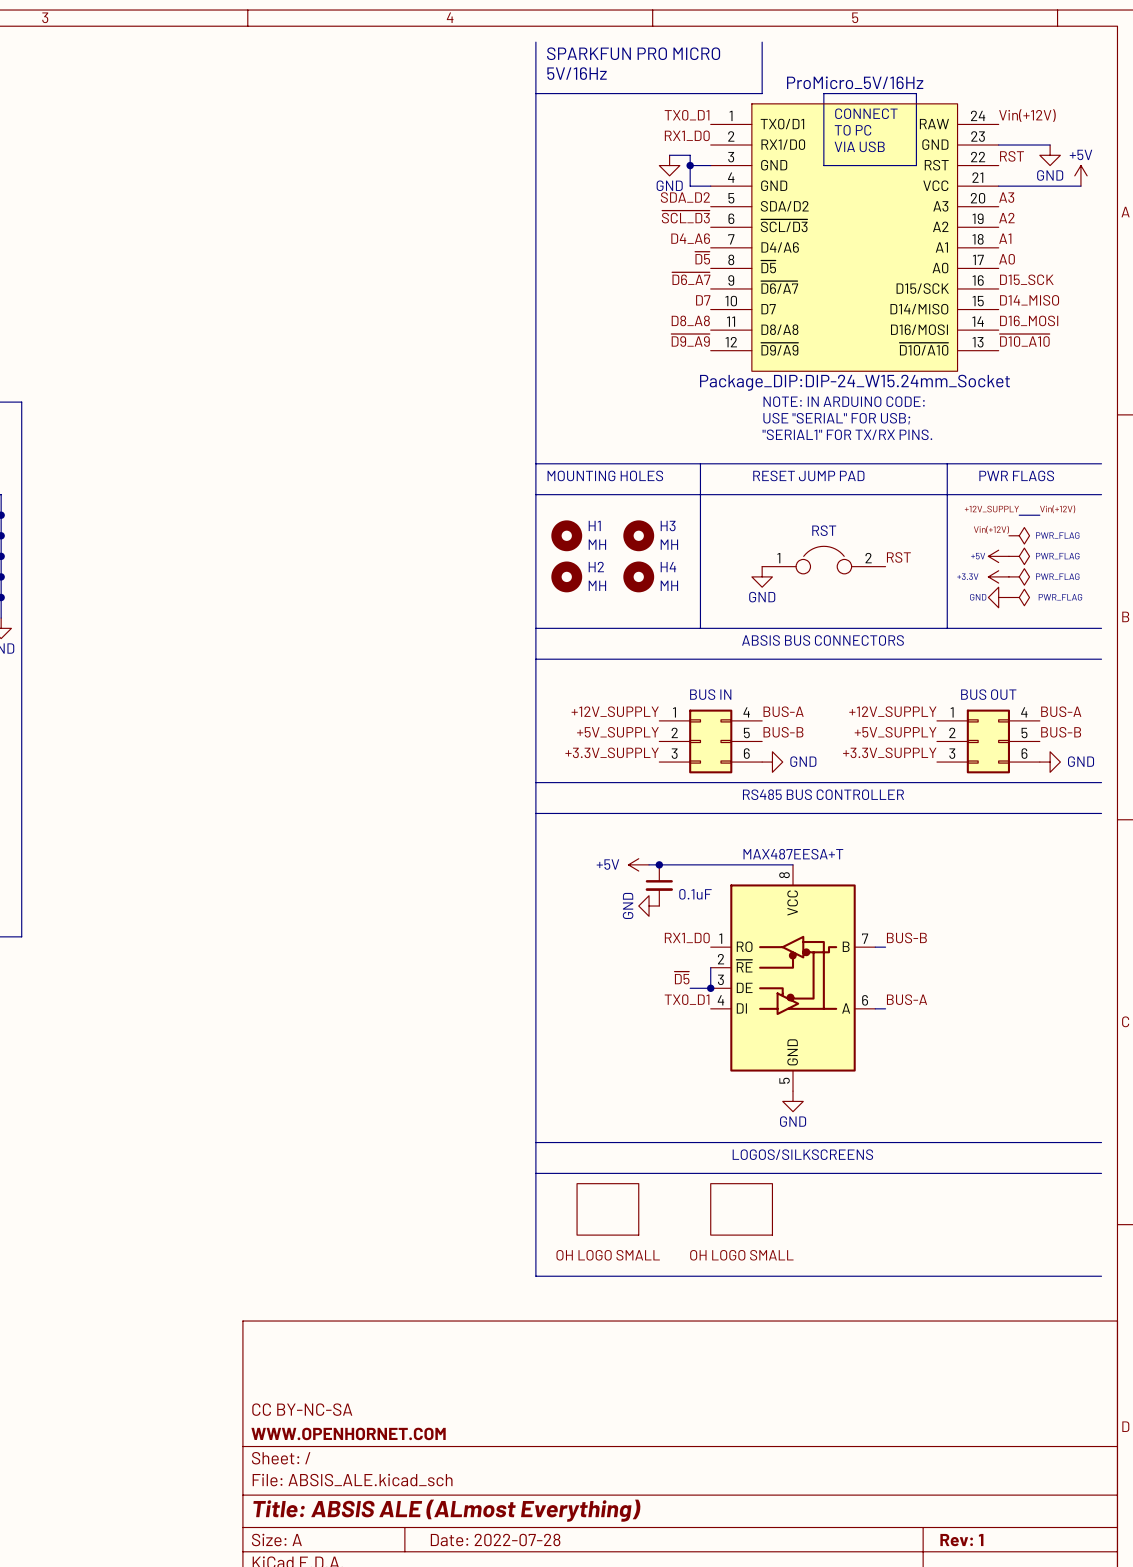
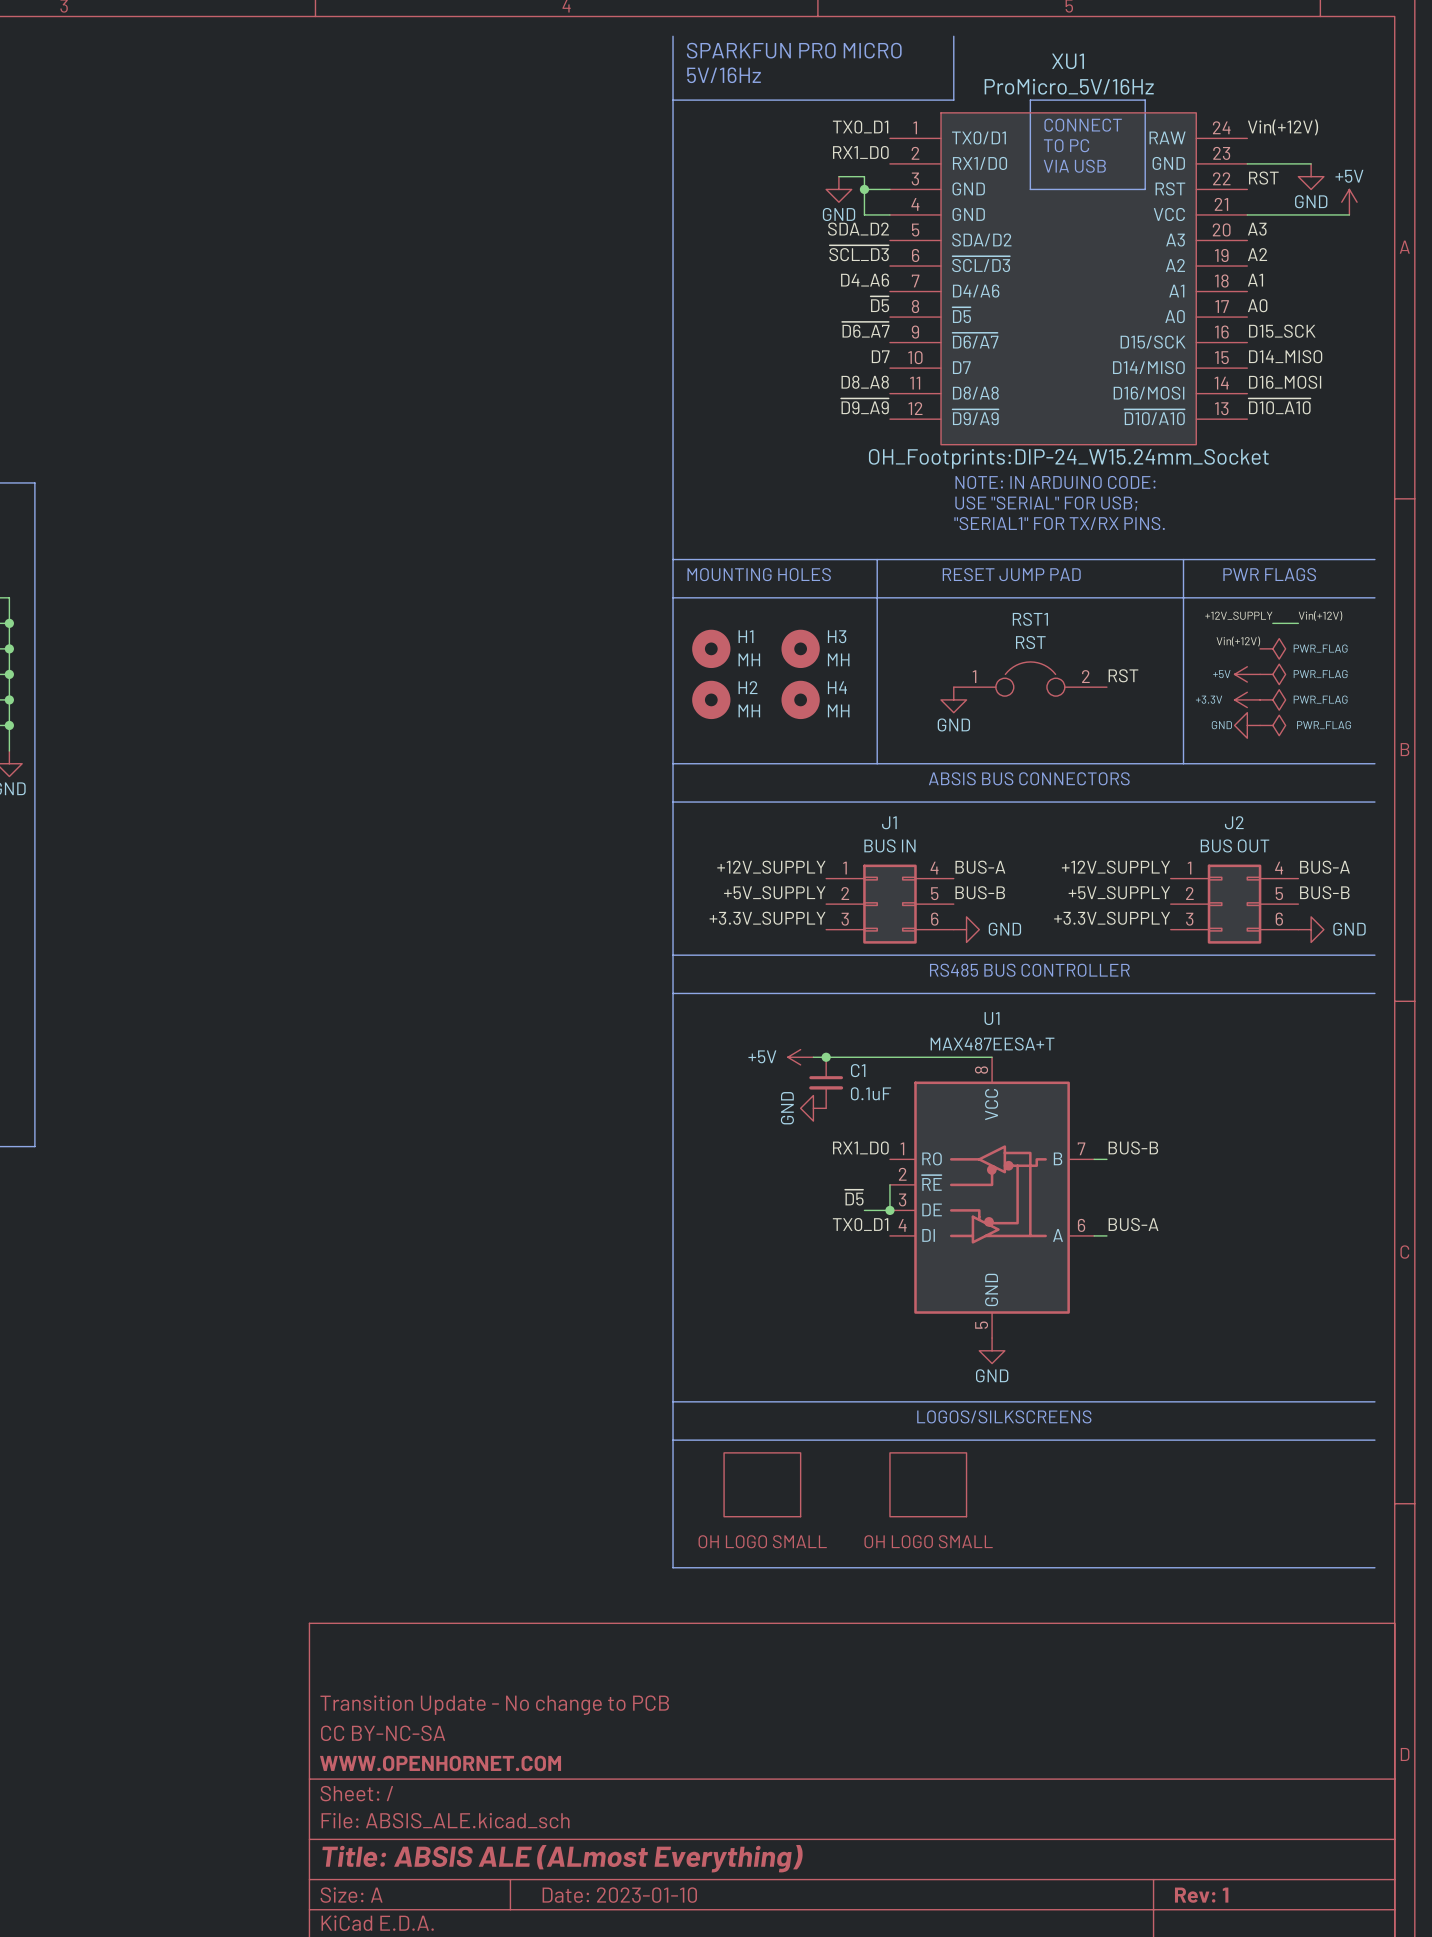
XU1 name: none -> XU1 (1068, 61)
XU1 text: Package_DIP:DIP-24_W15.24mm_Socket (854, 382) -> OH_Footprints:DIP-24_W15.24mm_Socket (1068, 458)
RST1 name: none -> RST1 (1030, 619)
J1 name: none -> J1 (889, 822)
J2 name: none -> J2 (1234, 822)
U1 name: none -> U1 (992, 1018)
C1 name: none -> C1 (858, 1070)
title block: none -> Transition Update - No change to PCB (494, 1705)
title block: Date: 2022-07-28 (495, 1540) -> Date: 2023-01-10 (619, 1895)

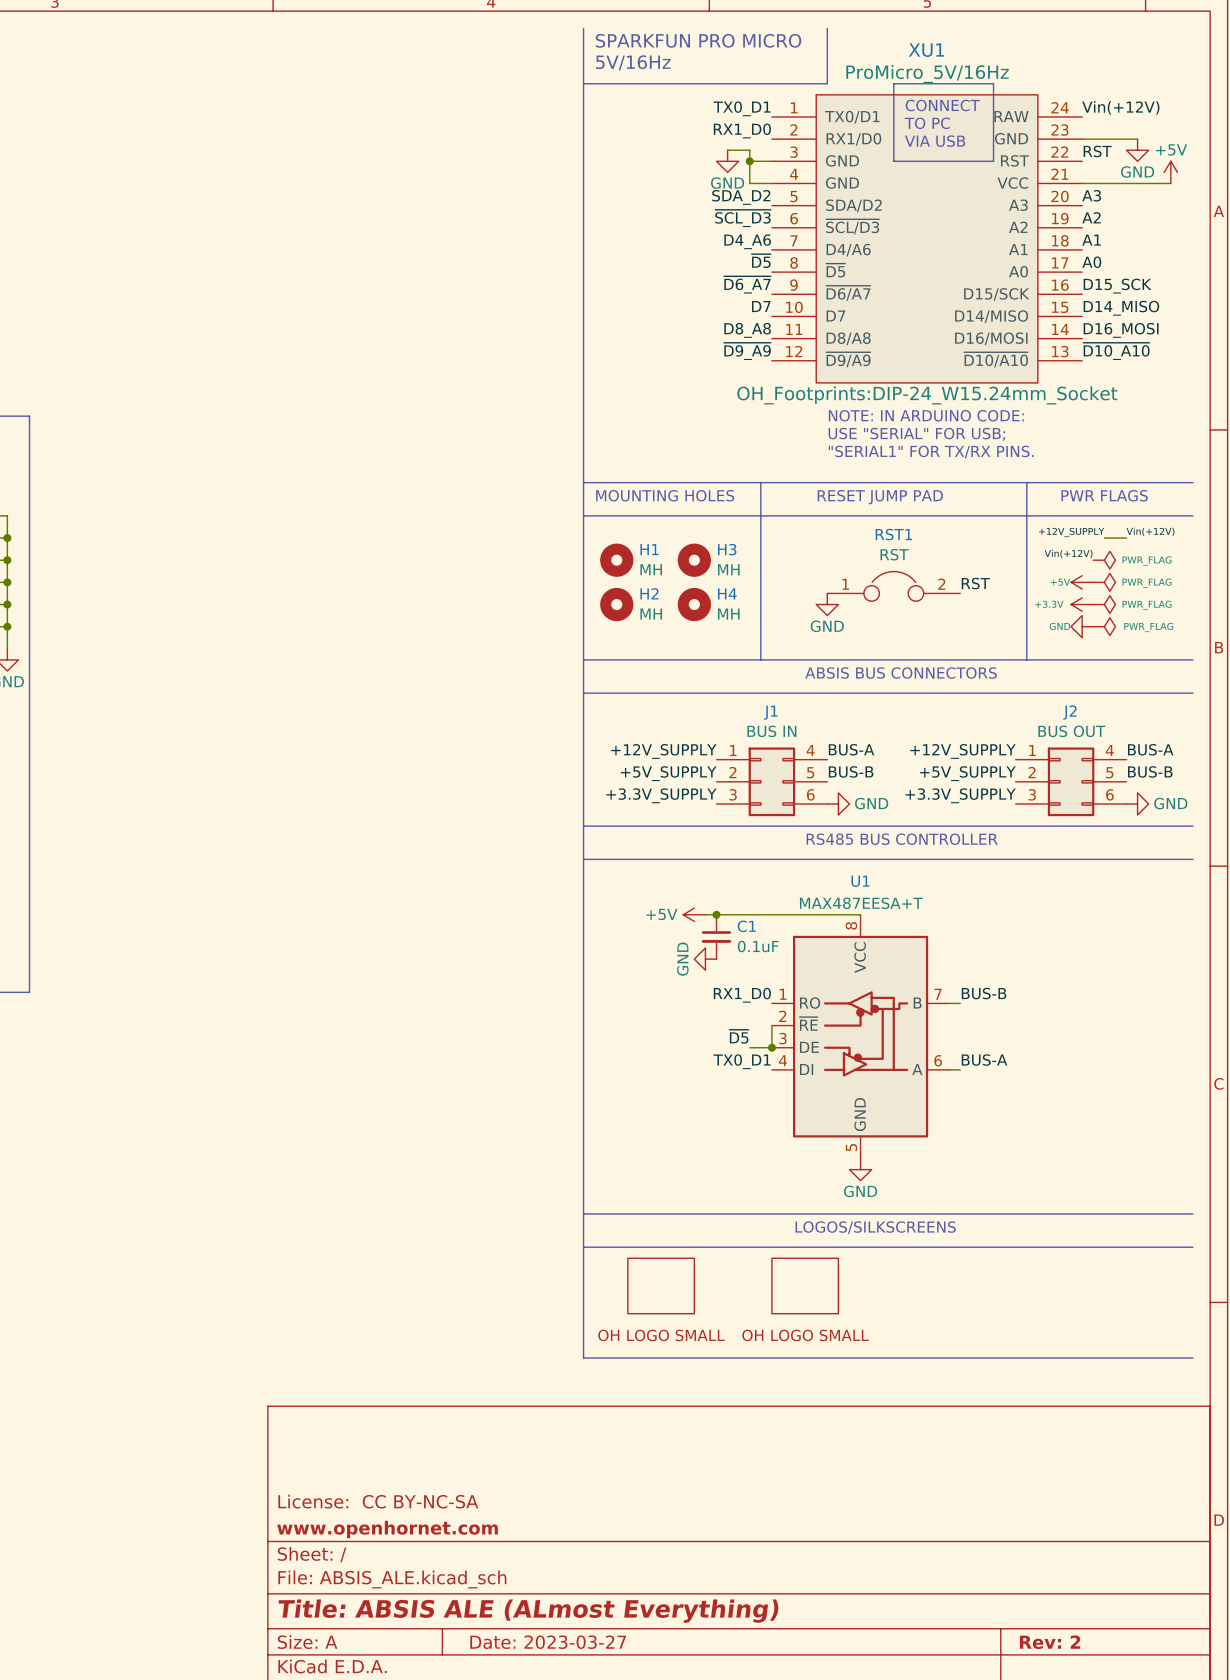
title block: Transition Update - No change to PCB (494, 1705) -> none
title block: CC BY-NC-SA (383, 1733) -> License: CC BY-NC-SA (378, 1501)
title block: WWW.OPENHORNET.COM (440, 1763) -> www.openhornet.com (387, 1529)
title block: Date: 2023-01-10 (619, 1895) -> Date: 2023-03-27 (548, 1642)
title block: Rev: 1 (1201, 1895) -> Rev: 2 (1050, 1642)

